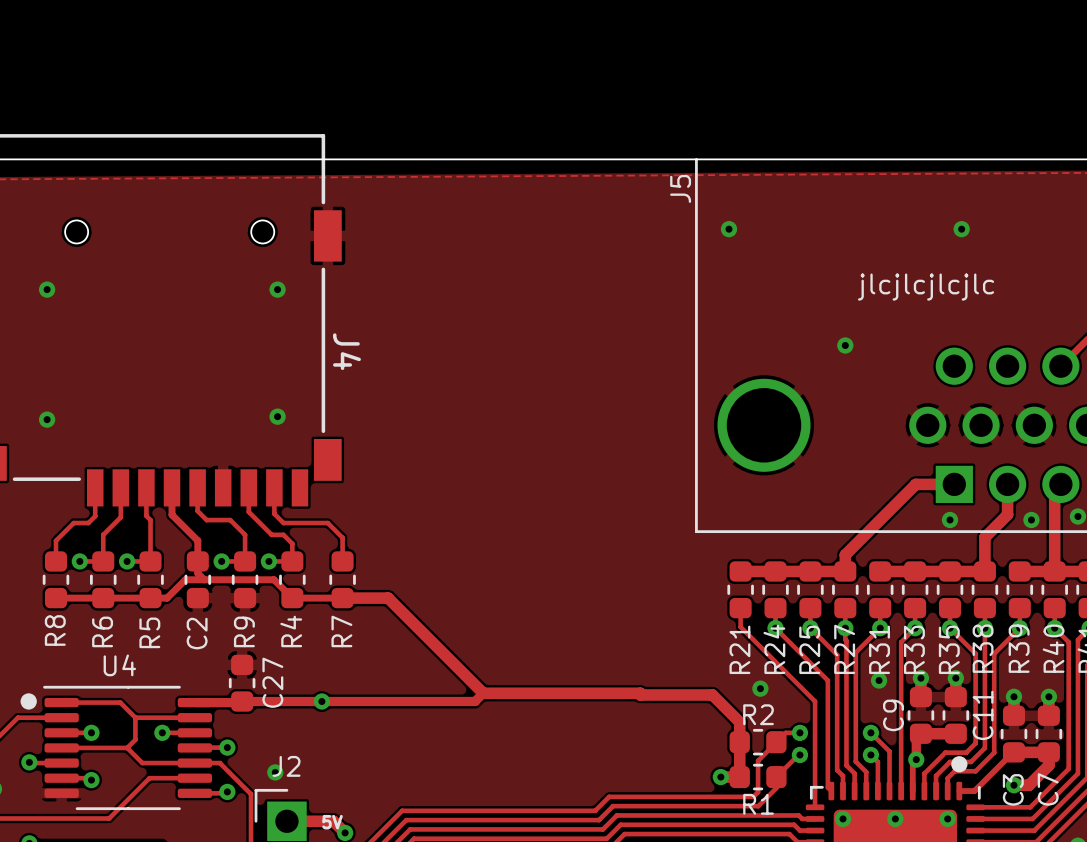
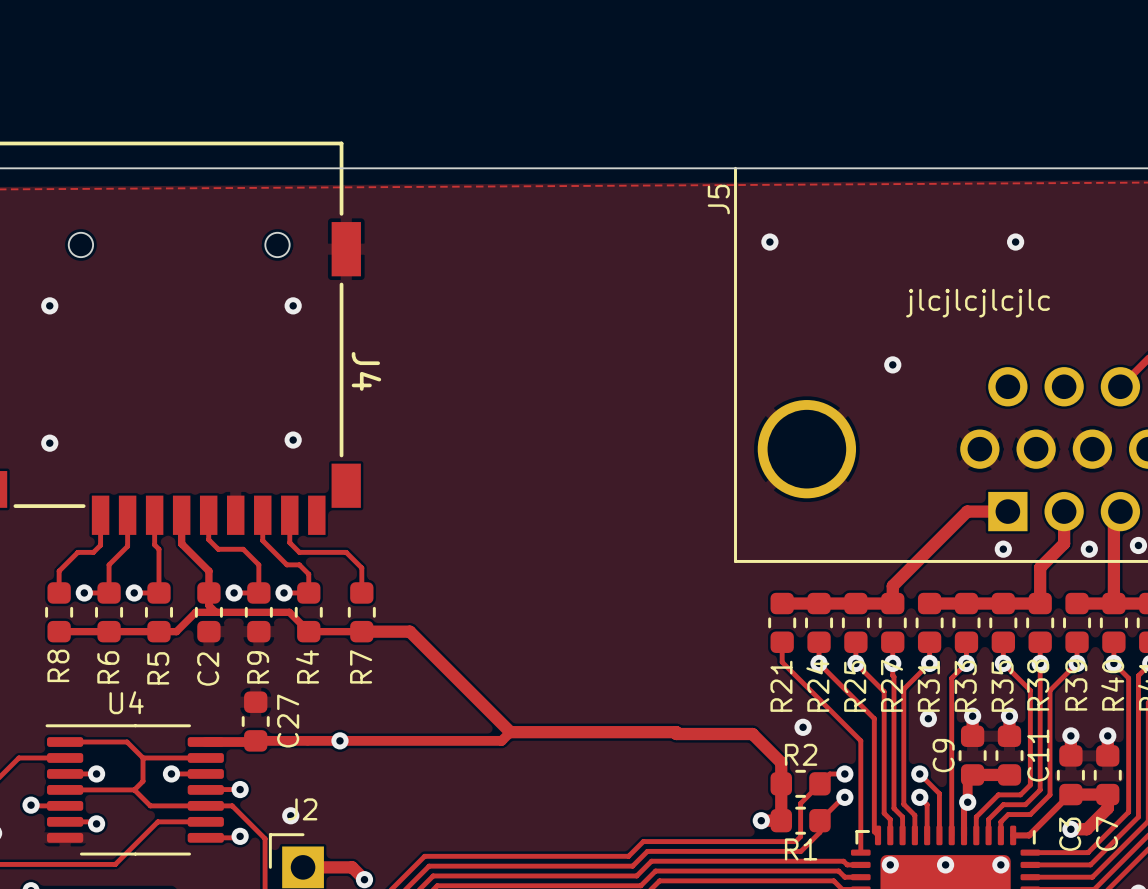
drawing: [20, 693, 37, 710] -> none
drawing: [951, 756, 968, 773] -> none
text: 5V (332, 822) -> none

